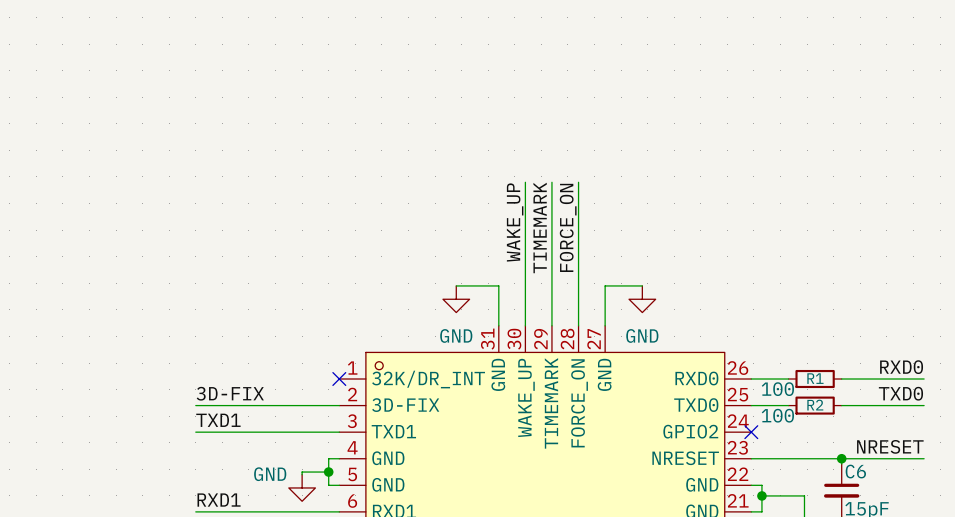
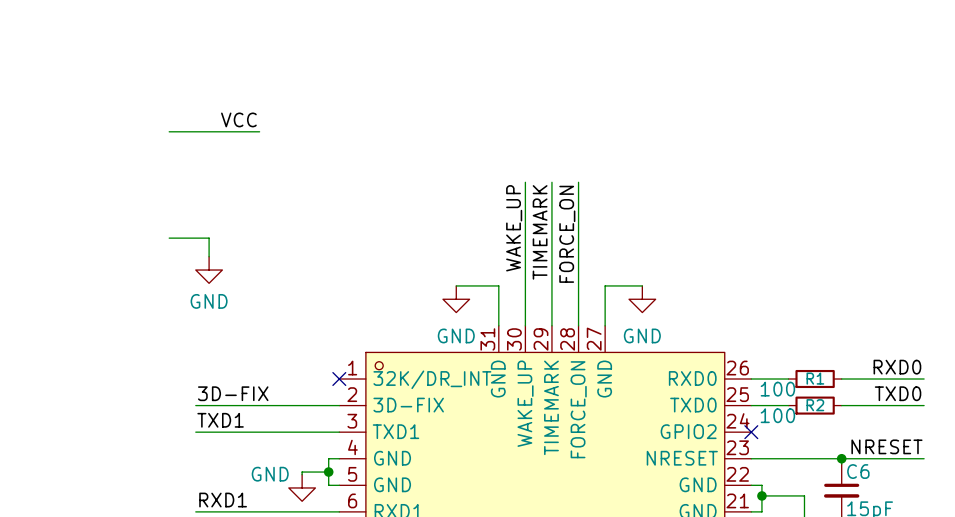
label: none -> VCC (238, 119)
wire: none -> (169, 131) (259, 131)
wire: none -> (169, 238) (209, 238) (209, 256)
power symbol: none -> GND (209, 270)

